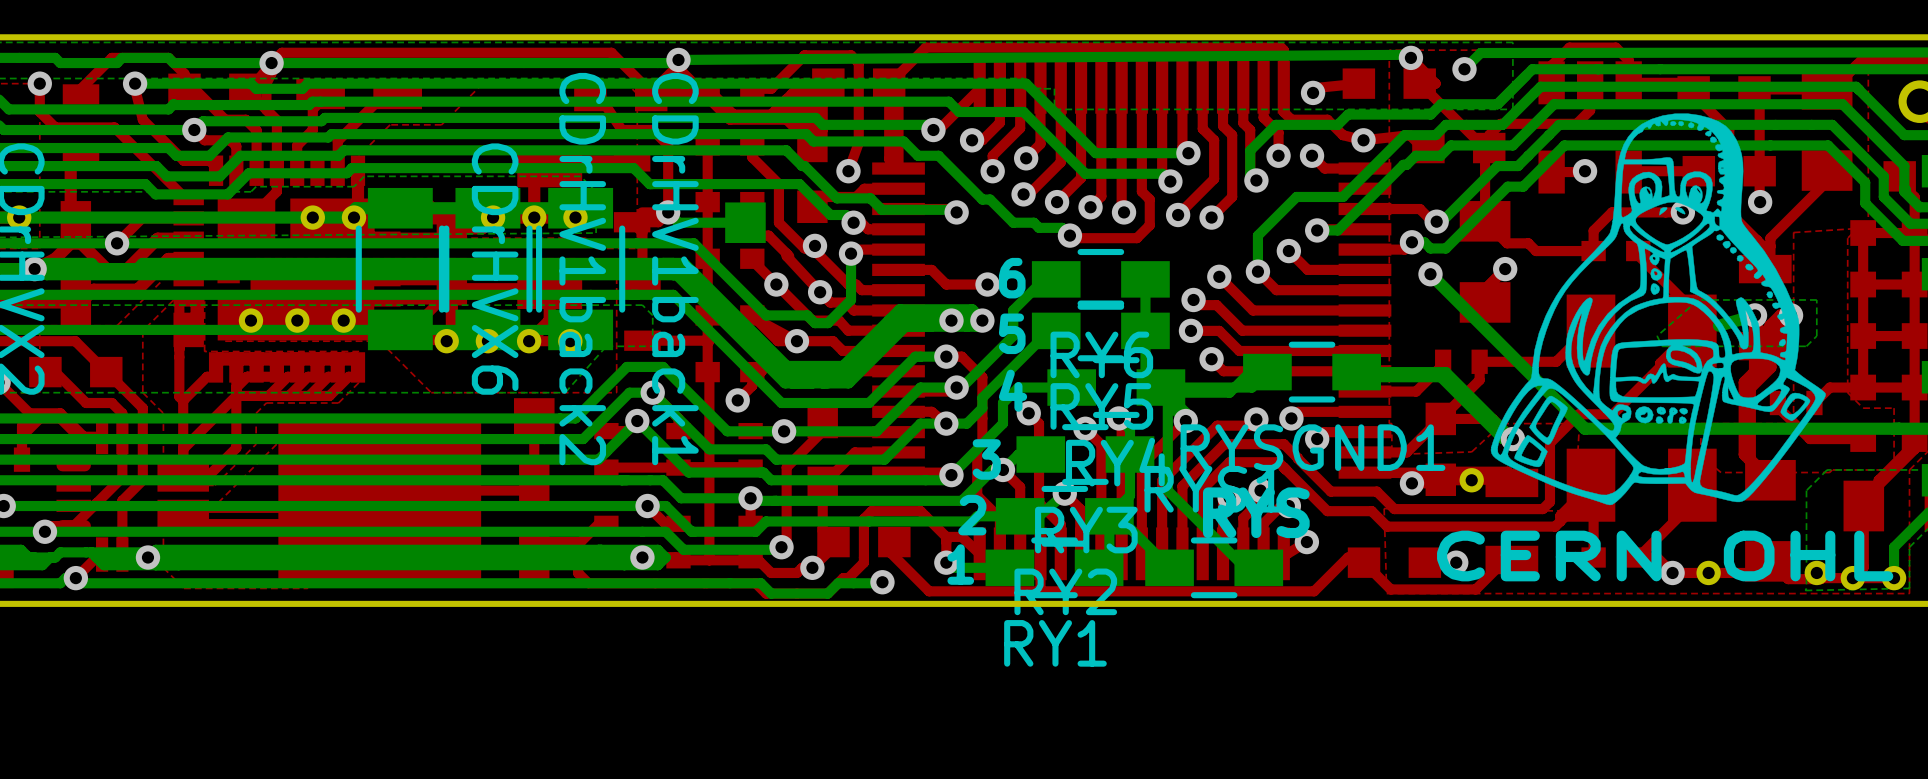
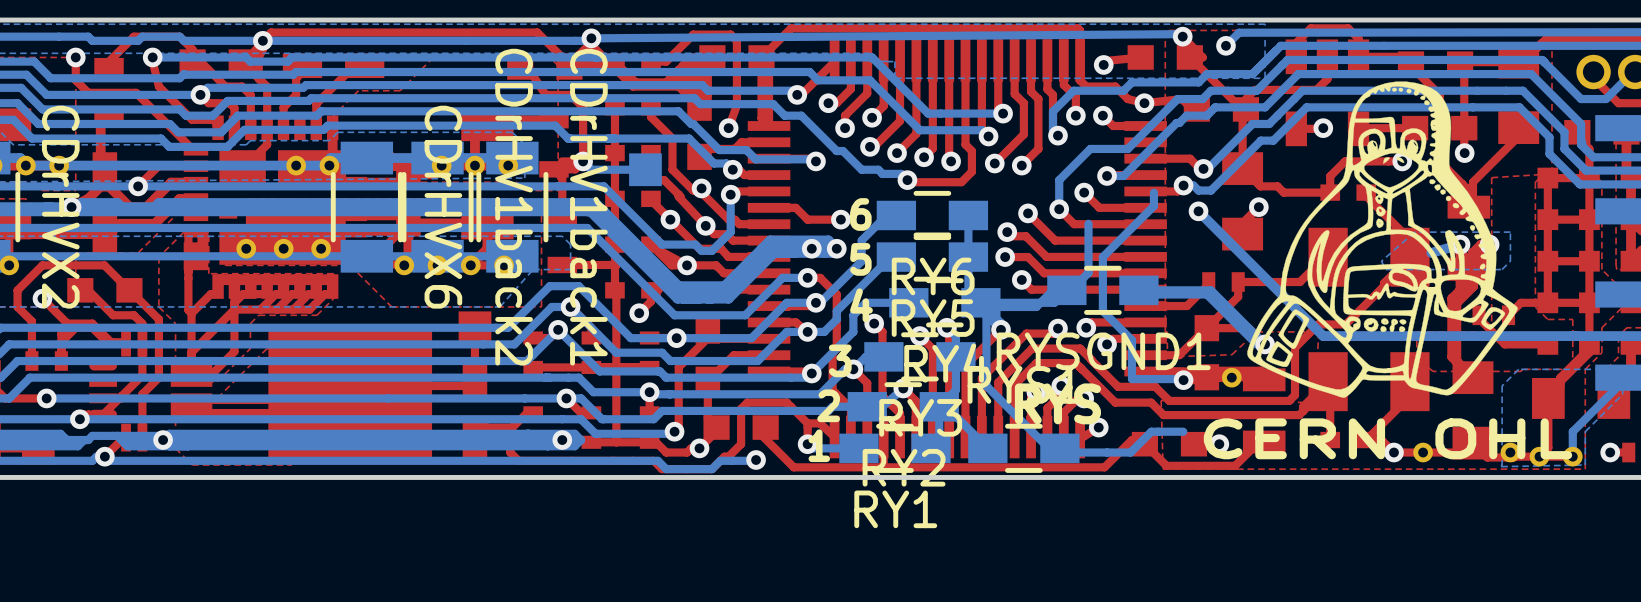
bottom track: none -> (1153, 192) (1153, 206) (1102, 257) (1102, 311) (1131, 340) (1131, 379) (1183, 380)
bottom track: none -> (1088, 223) (1088, 272) (1066, 294)
bottom track: none -> (1183, 431) (1151, 431) (1130, 452) (1077, 452) (1073, 448) (1059, 448)

